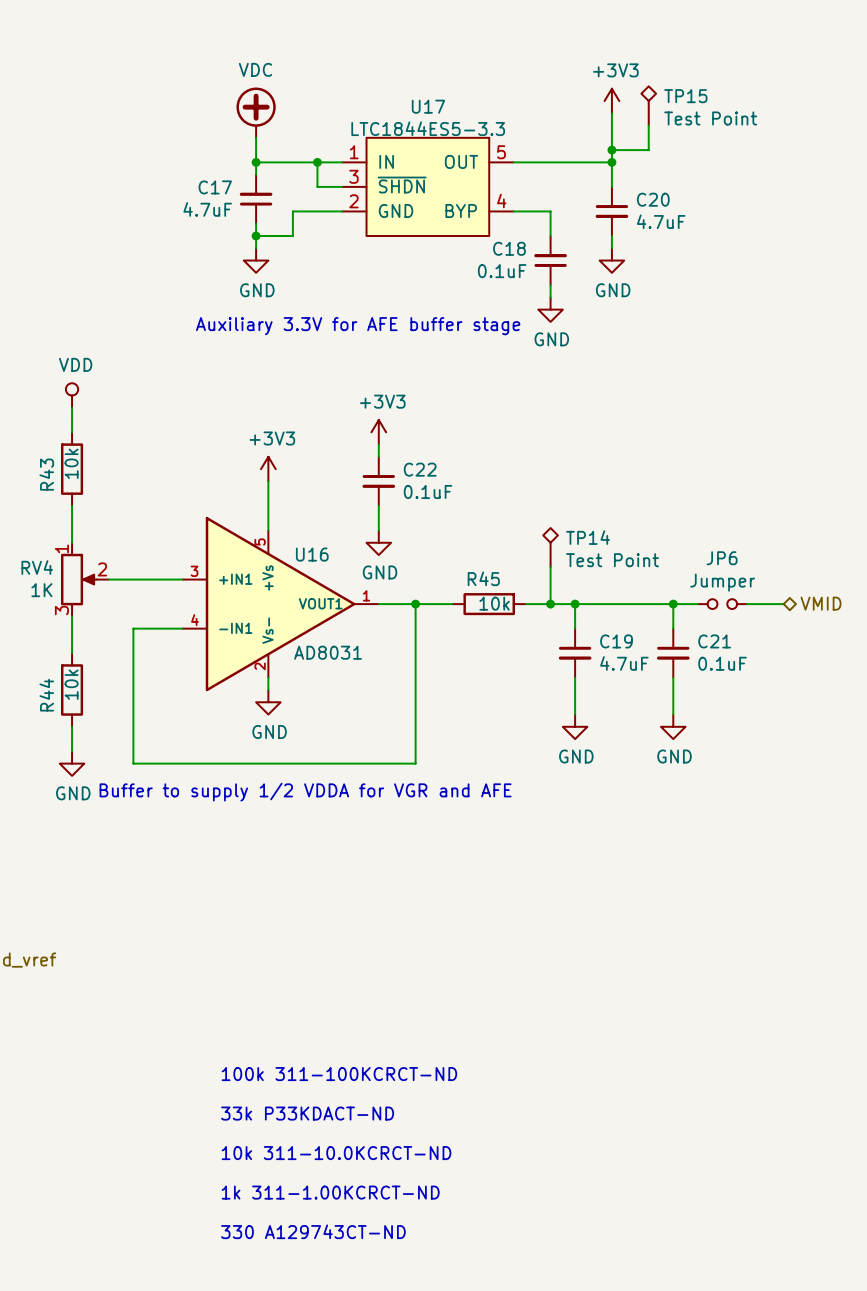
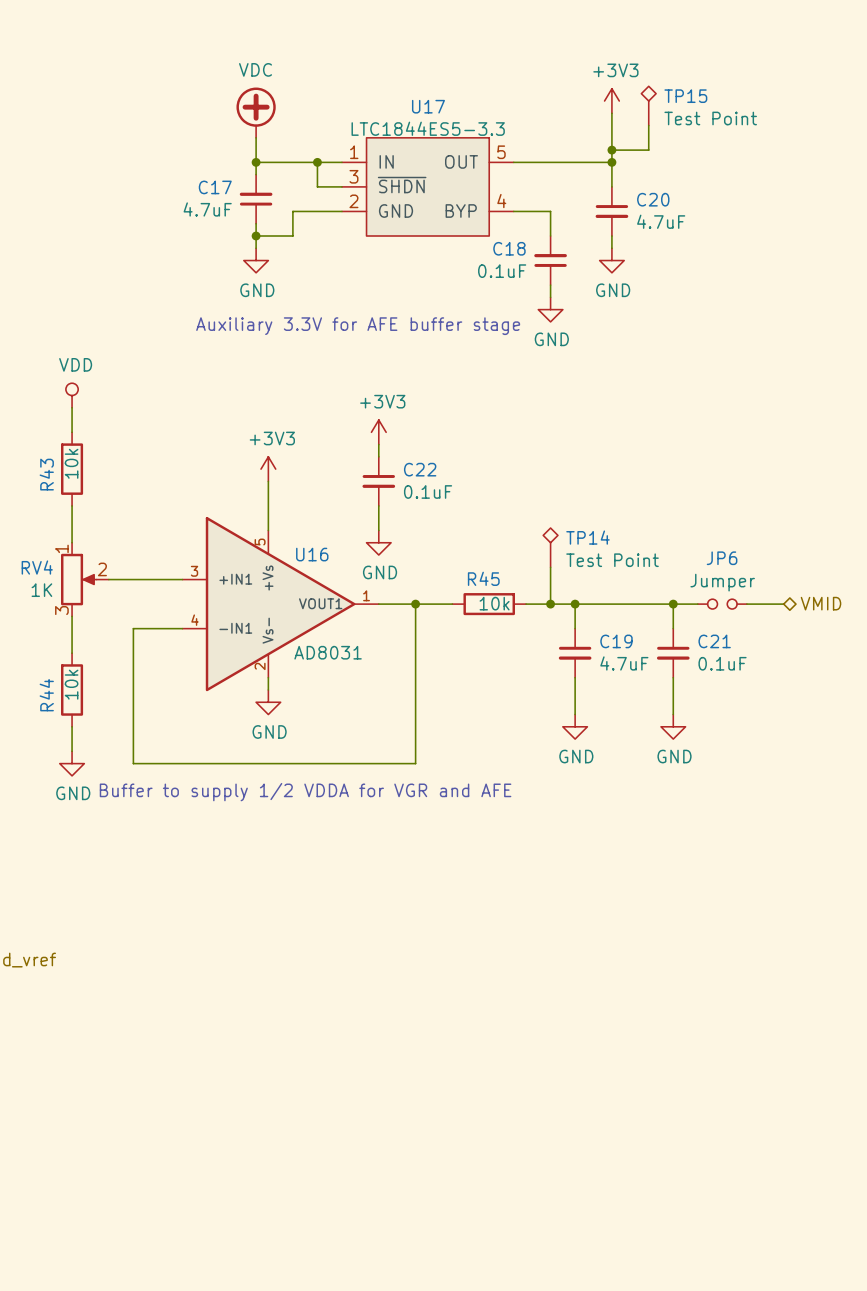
text: 100k 311-100KCRCT-ND (339, 1074) -> none
text: 33k P33KDACT-ND (307, 1113) -> none
text: 10k 311-10.0KCRCT-ND (336, 1153) -> none
text: 1k 311-1.00KCRCT-ND (330, 1192) -> none
text: 330 A129743CT-ND (313, 1231) -> none

